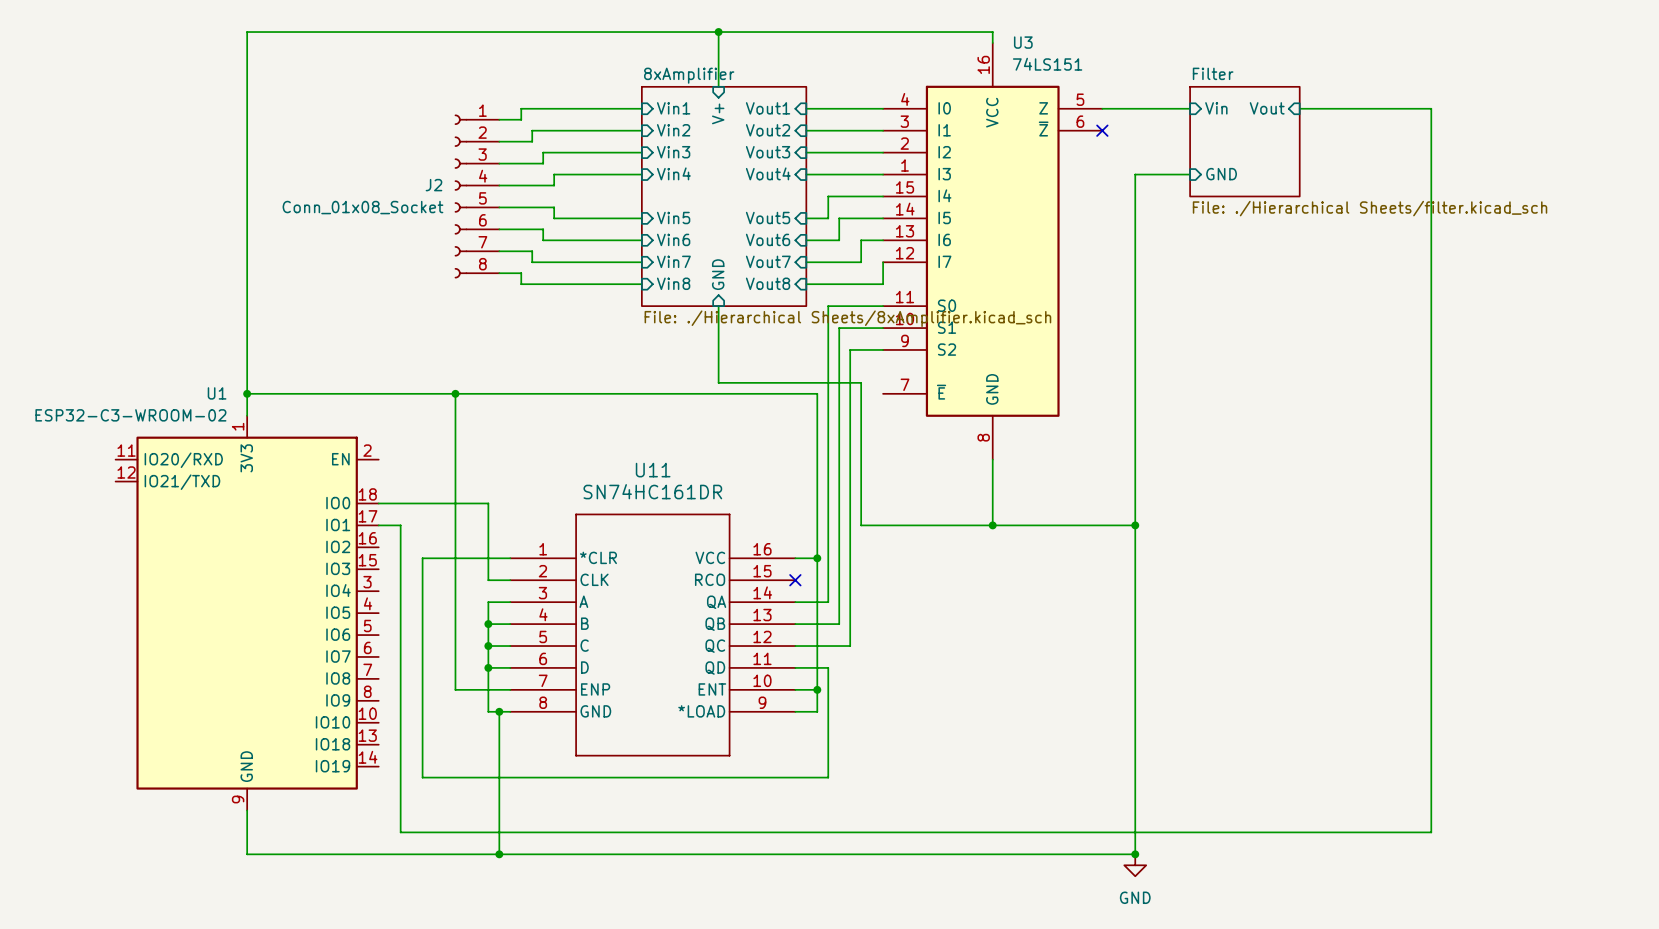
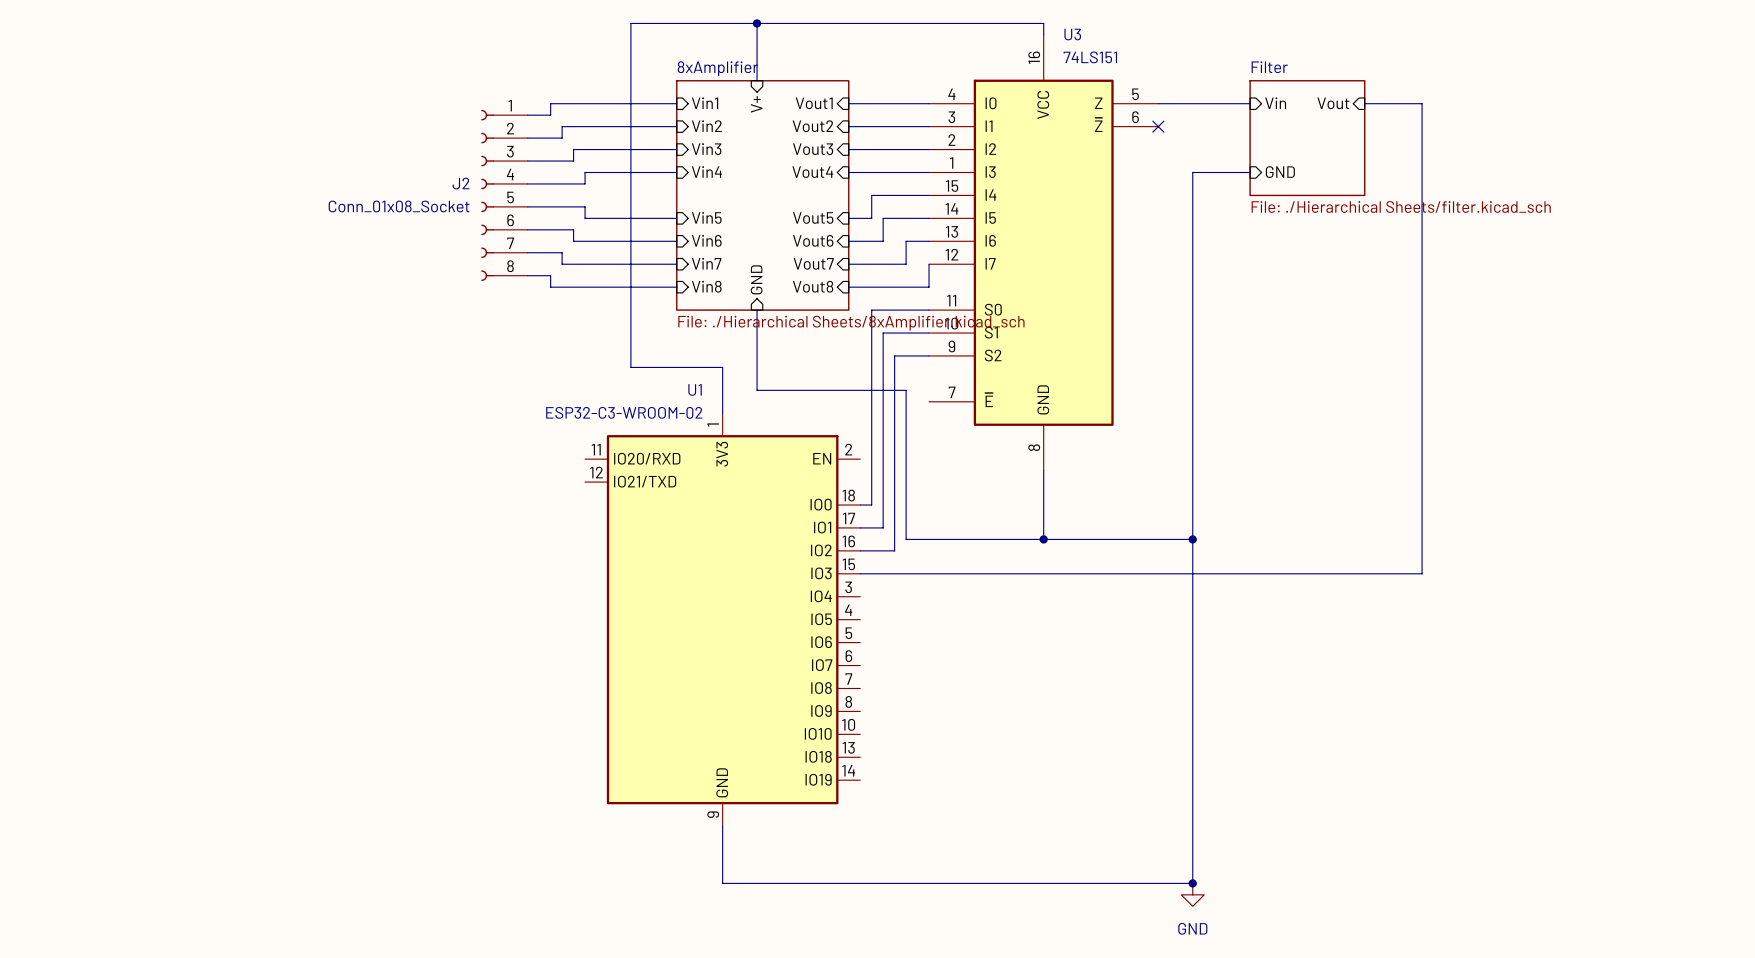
wire: (598, 32) (247, 32) (247, 415) -> (630, 23) (630, 367) (722, 367) (722, 413)
wire: (1354, 108) (1431, 108) (1431, 832) (400, 832) (400, 525) (378, 525) -> (1422, 103) (1422, 573) (860, 573)
wire: (247, 393) (817, 393) (817, 711) (795, 711) -> none
junction: (247, 393) -> none
wire: (455, 393) (455, 689) (510, 689) -> none
junction: (455, 393) -> none
wire: (828, 492) (828, 602) (795, 602) -> (871, 505) (860, 505)
wire: (378, 503) (488, 503) (488, 580) (510, 580) -> none
wire: (839, 514) (839, 624) (795, 624) -> (883, 527) (860, 527)
wire: (850, 536) (850, 646) (795, 646) -> (894, 550) (860, 550)
wire: (510, 558) (422, 558) (422, 777) (828, 777) (828, 667) (795, 667) -> none
junction: (817, 558) -> none
no-connect mark: (795, 580) -> none
wire: (510, 602) (488, 602) (488, 711) (510, 711) -> none
U1 position: (247, 613) -> (722, 619)
wire: (488, 624) (510, 624) -> none
junction: (488, 624) -> none
U11: SN74HC161DR (652, 635) -> none
wire: (488, 646) (510, 646) -> none
junction: (488, 646) -> none
wire: (488, 667) (510, 667) -> none
junction: (488, 667) -> none
junction: (817, 689) -> none
wire: (499, 711) (499, 854) -> none
junction: (499, 711) -> none
wire: (247, 810) (247, 854) (685, 854) -> (722, 826) (722, 883)
junction: (499, 854) -> none

